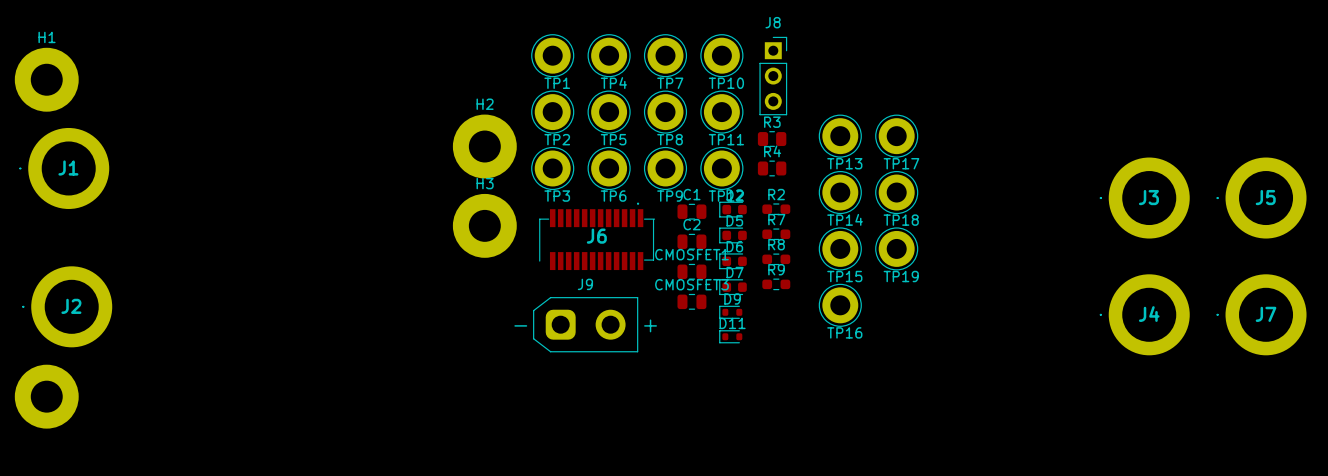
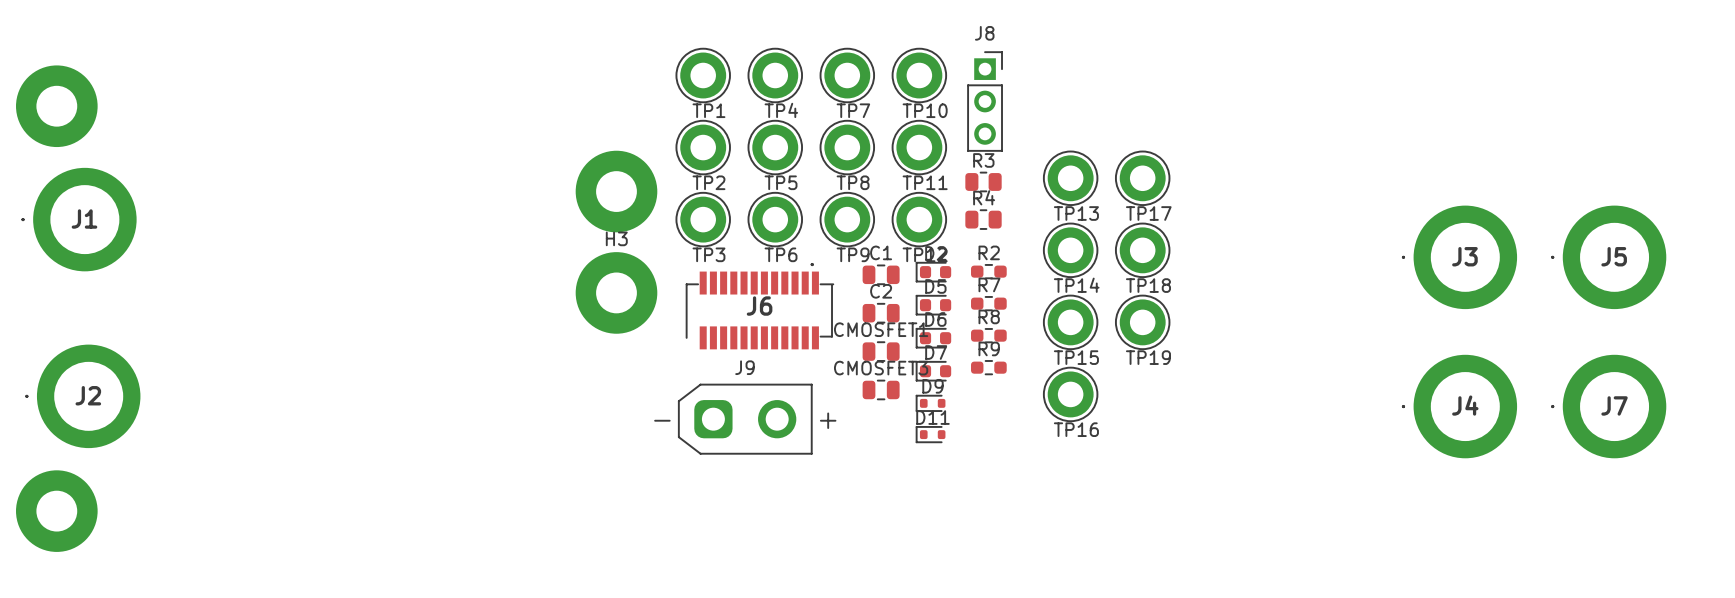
H1 name: H1 (47, 37) -> none
H2 name: H2 (485, 104) -> none

